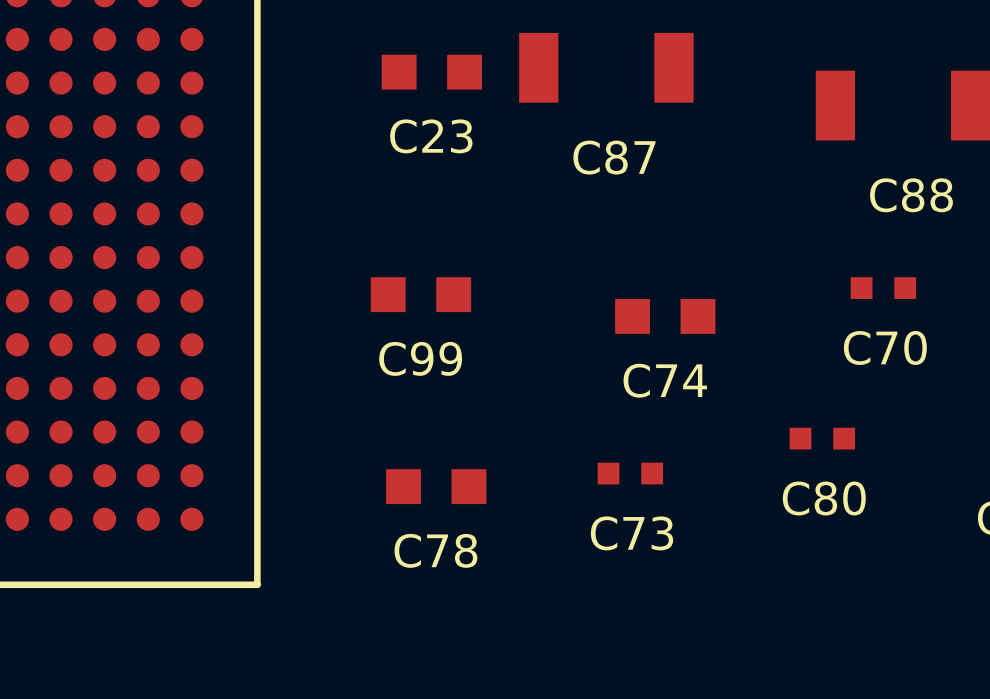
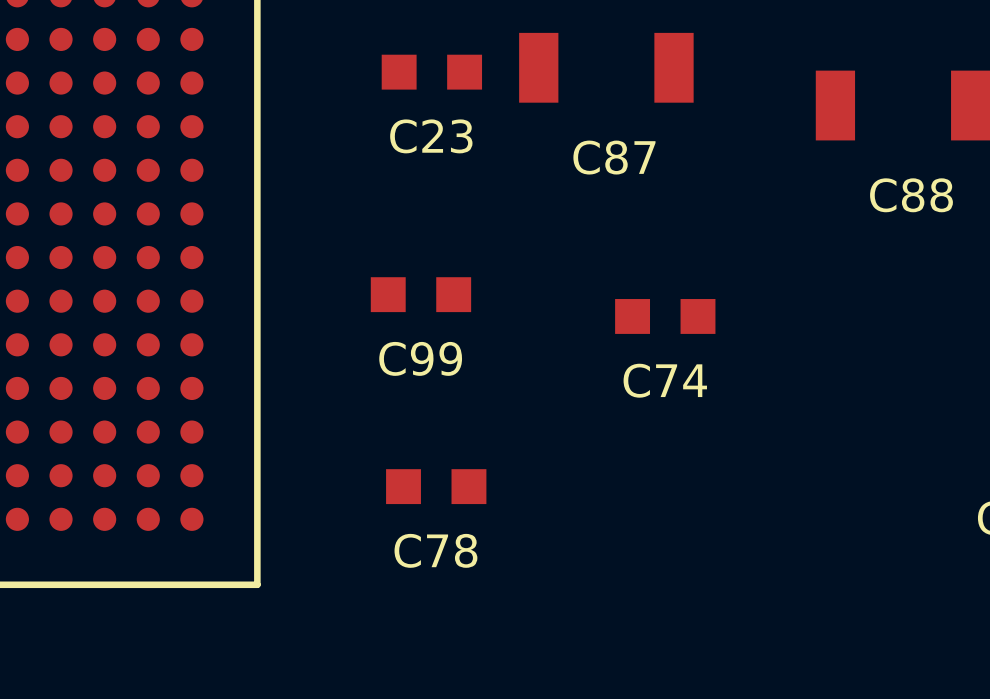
C70: (883, 288) -> none
C80: (822, 438) -> none
C73: (630, 473) -> none

